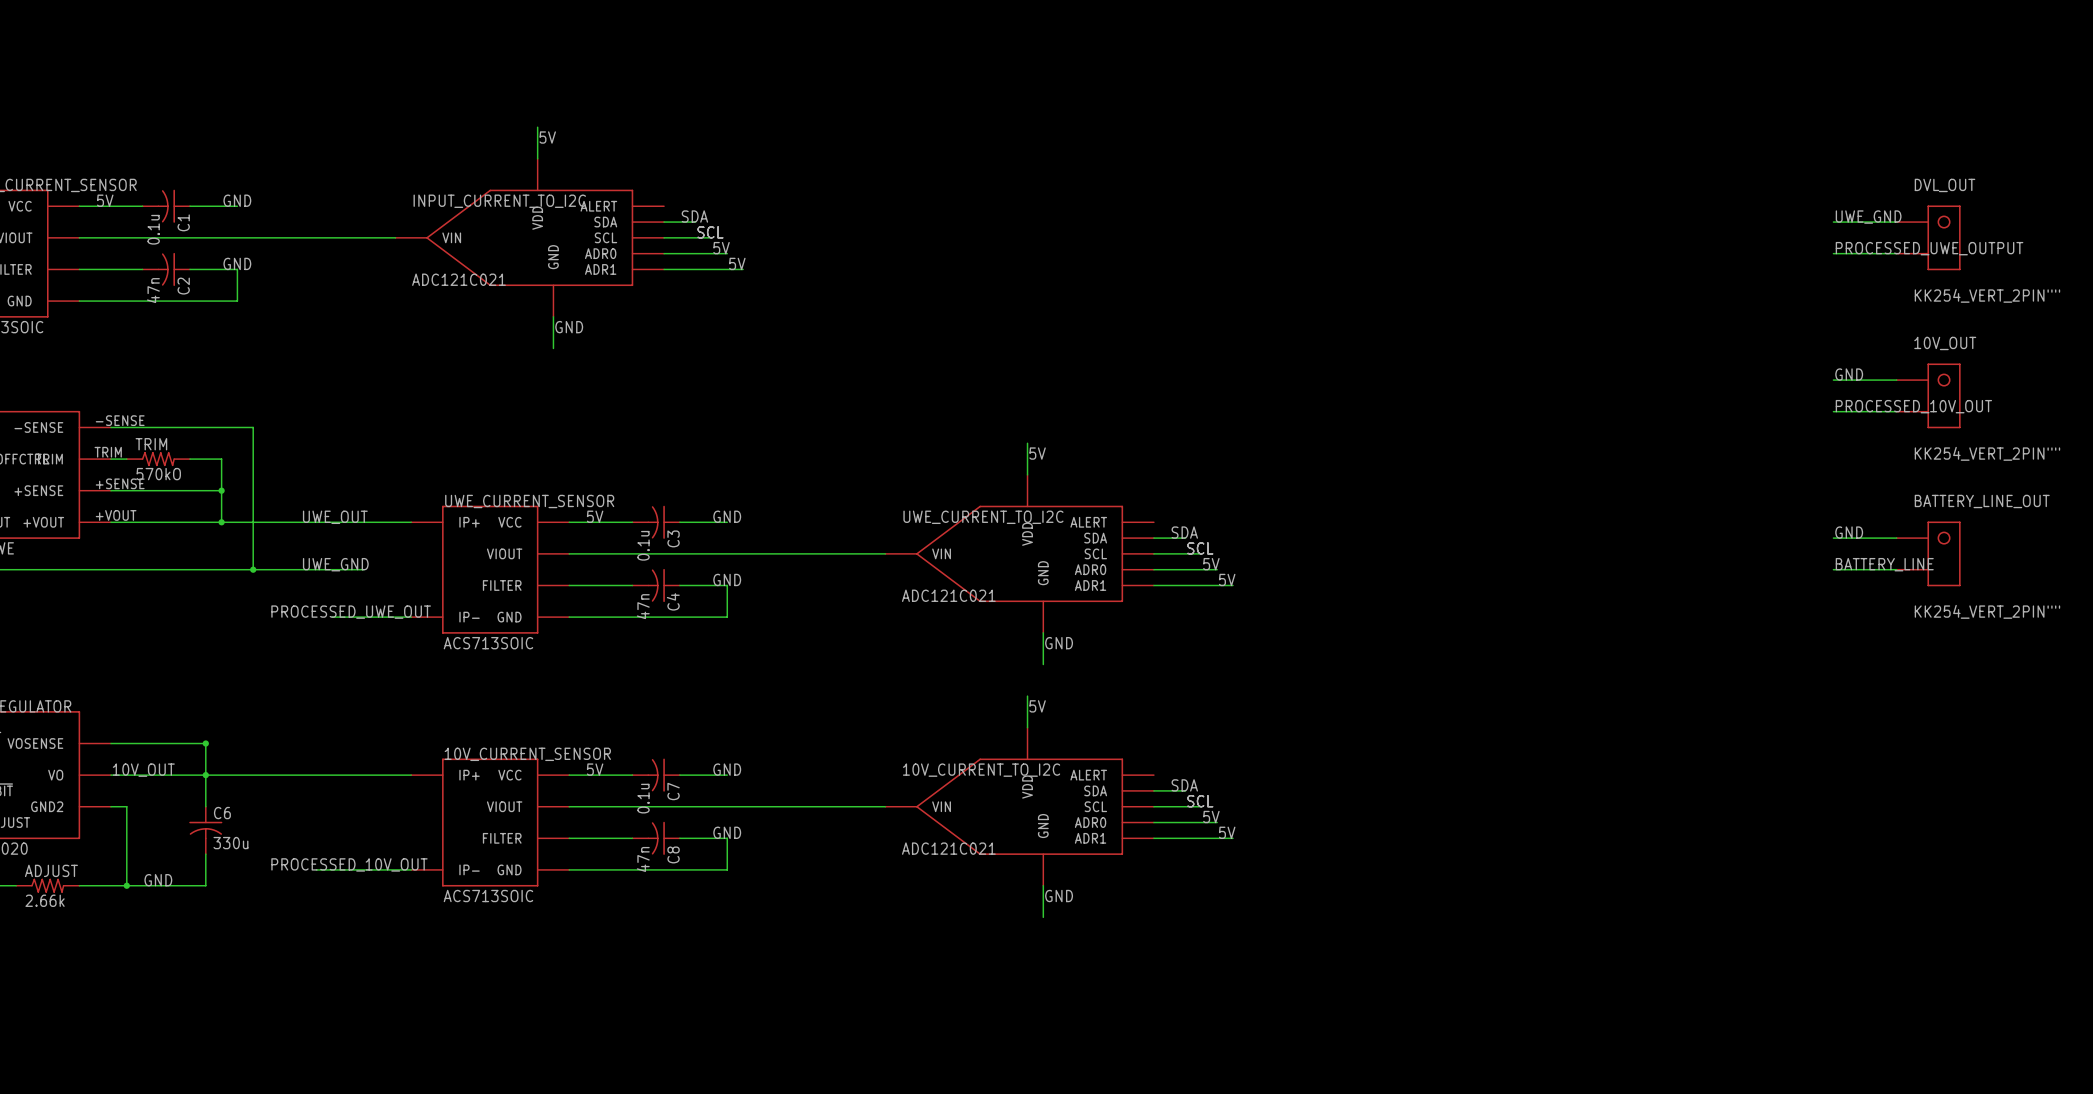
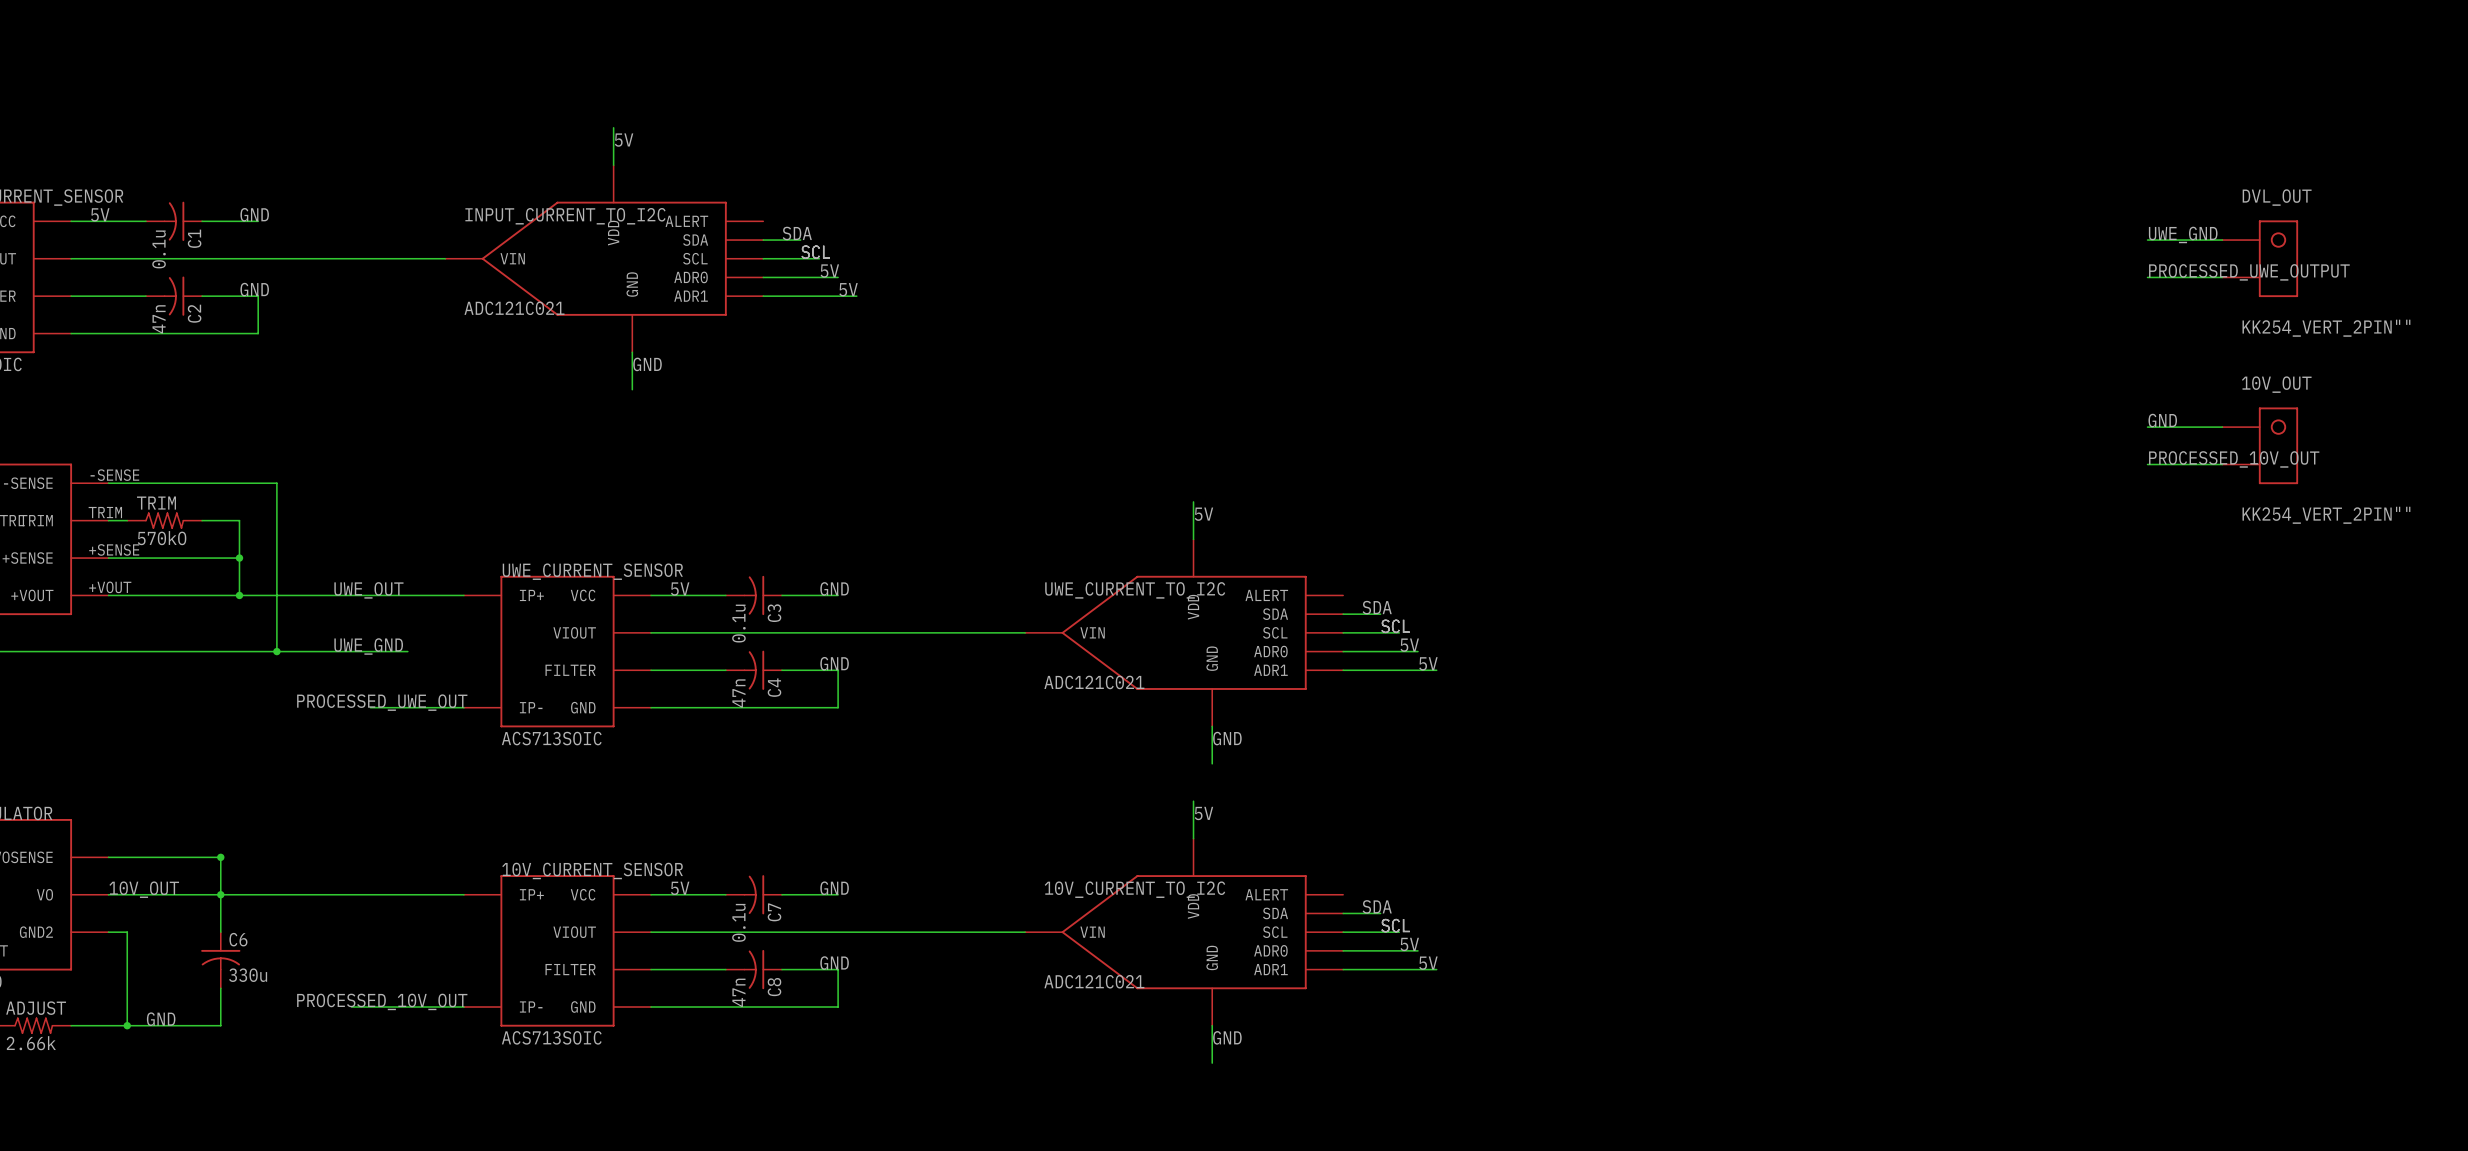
label: GND (1849, 532) -> none
wire: (1833, 538) (1896, 538) -> none
BATTERY_LINE_OUT: KK254_VERT_2PIN"" (1928, 553) -> none
label: BATTERY_LINE (1884, 564) -> none
wire: (1833, 569) (1896, 569) -> none

